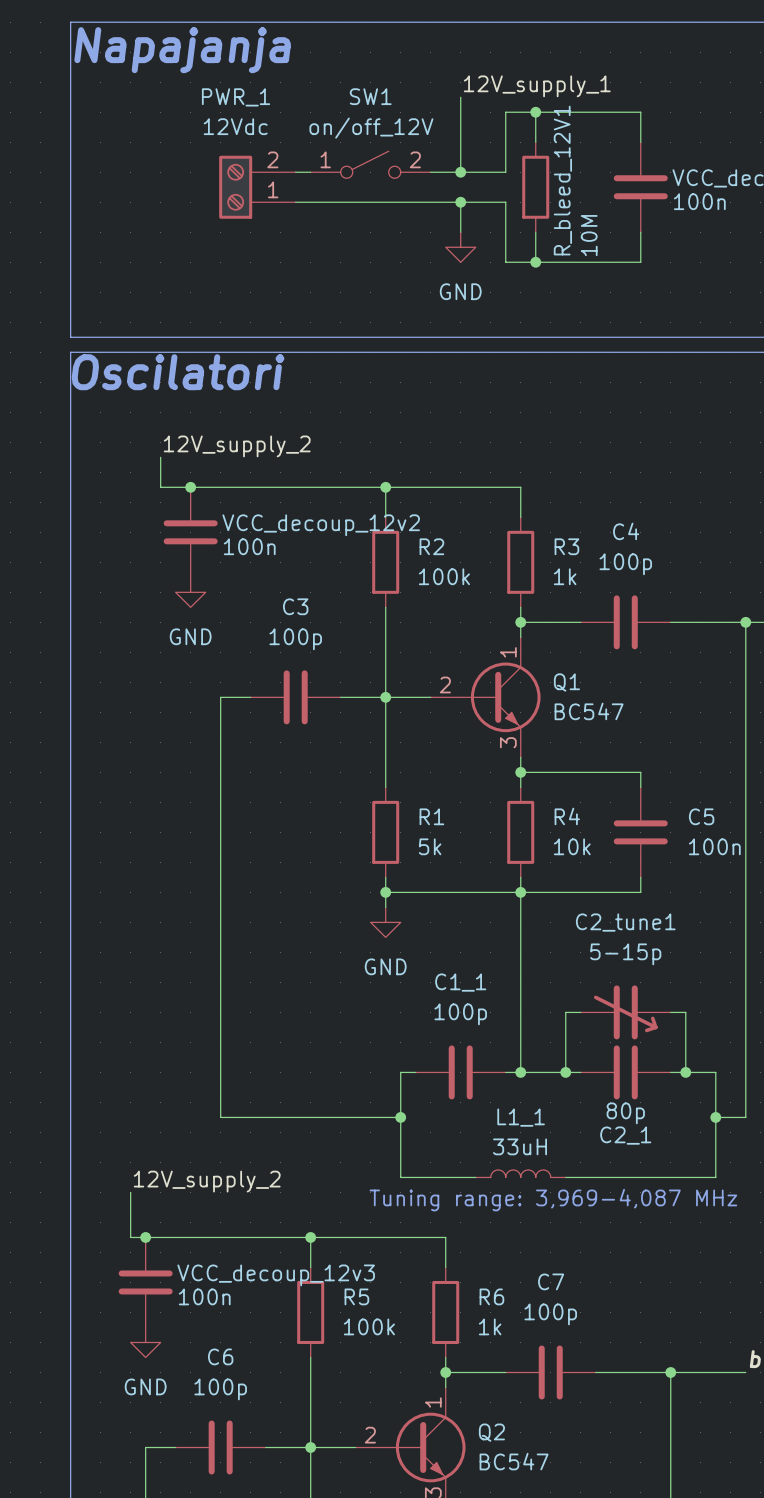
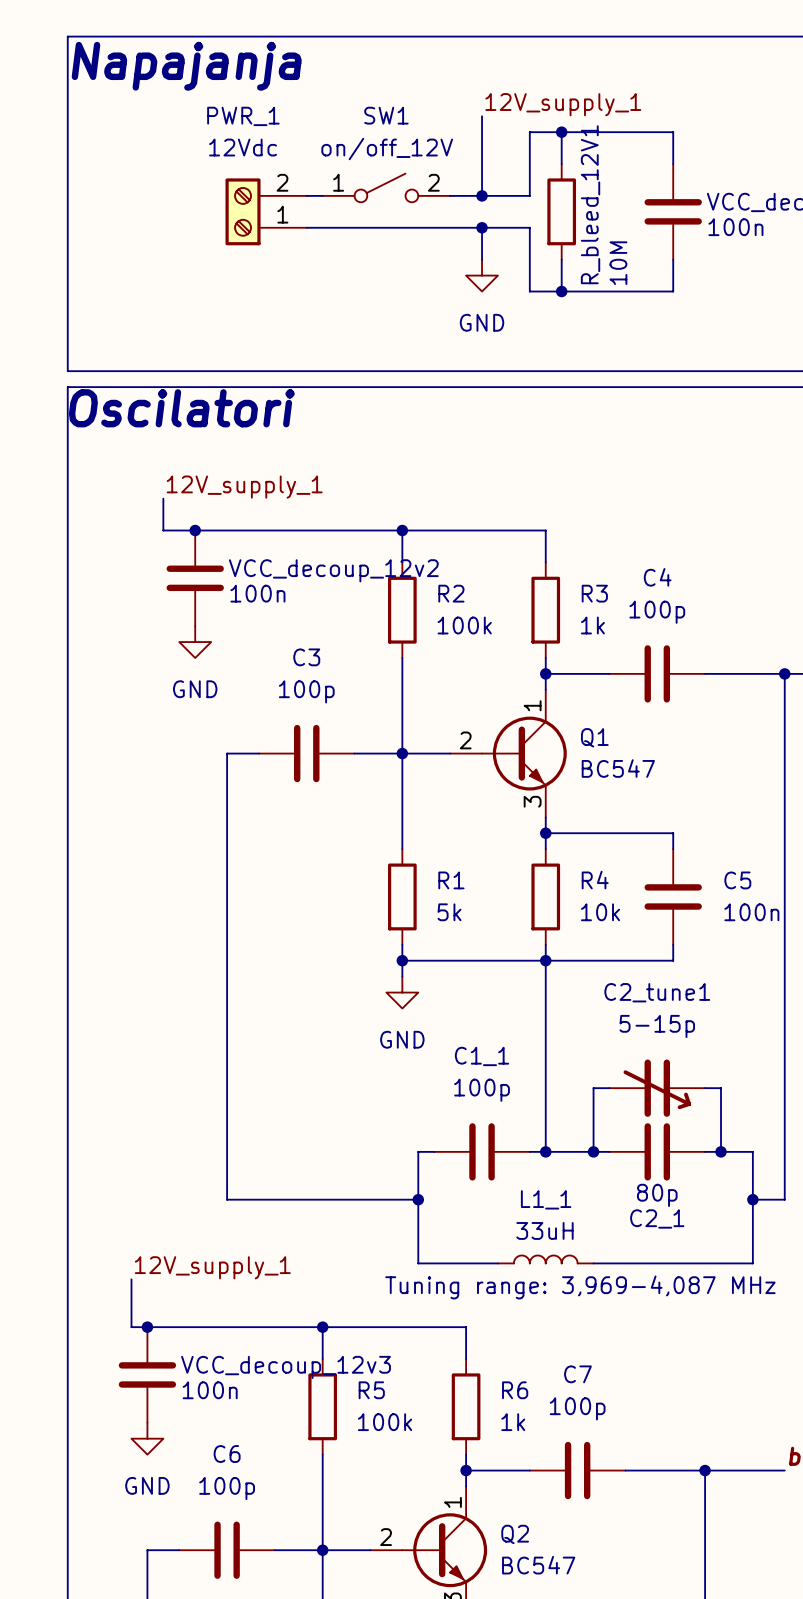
label: 12V_supply_2 (237, 446) -> 12V_supply_1 (244, 487)
label: 12V_supply_2 (207, 1181) -> 12V_supply_1 (212, 1267)

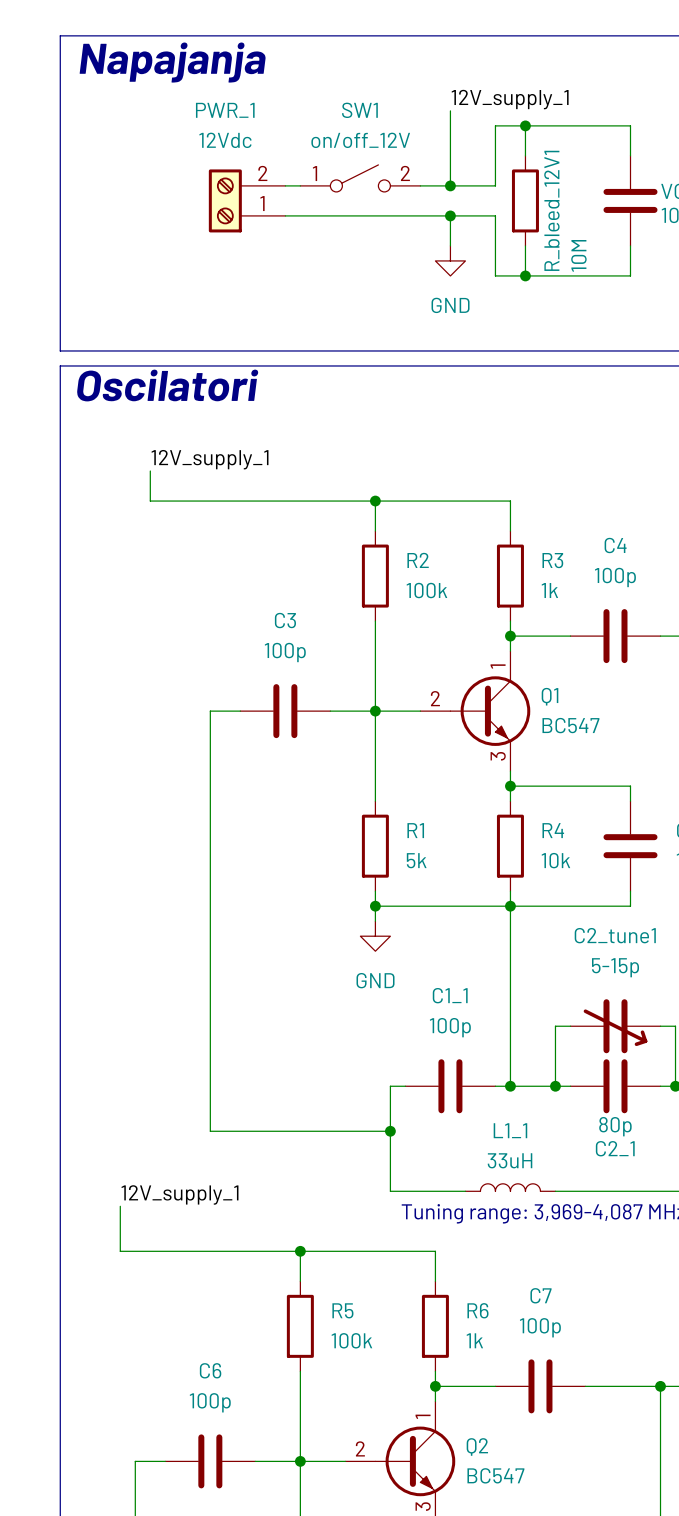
junction: (195, 530) -> none
VCC_decoup_12v2: 100n (195, 578) -> none
power symbol: GND (195, 642) -> none
junction: (147, 1327) -> none
VCC_decoup_12v3: 100n (147, 1374) -> none
power symbol: GND (147, 1438) -> none

